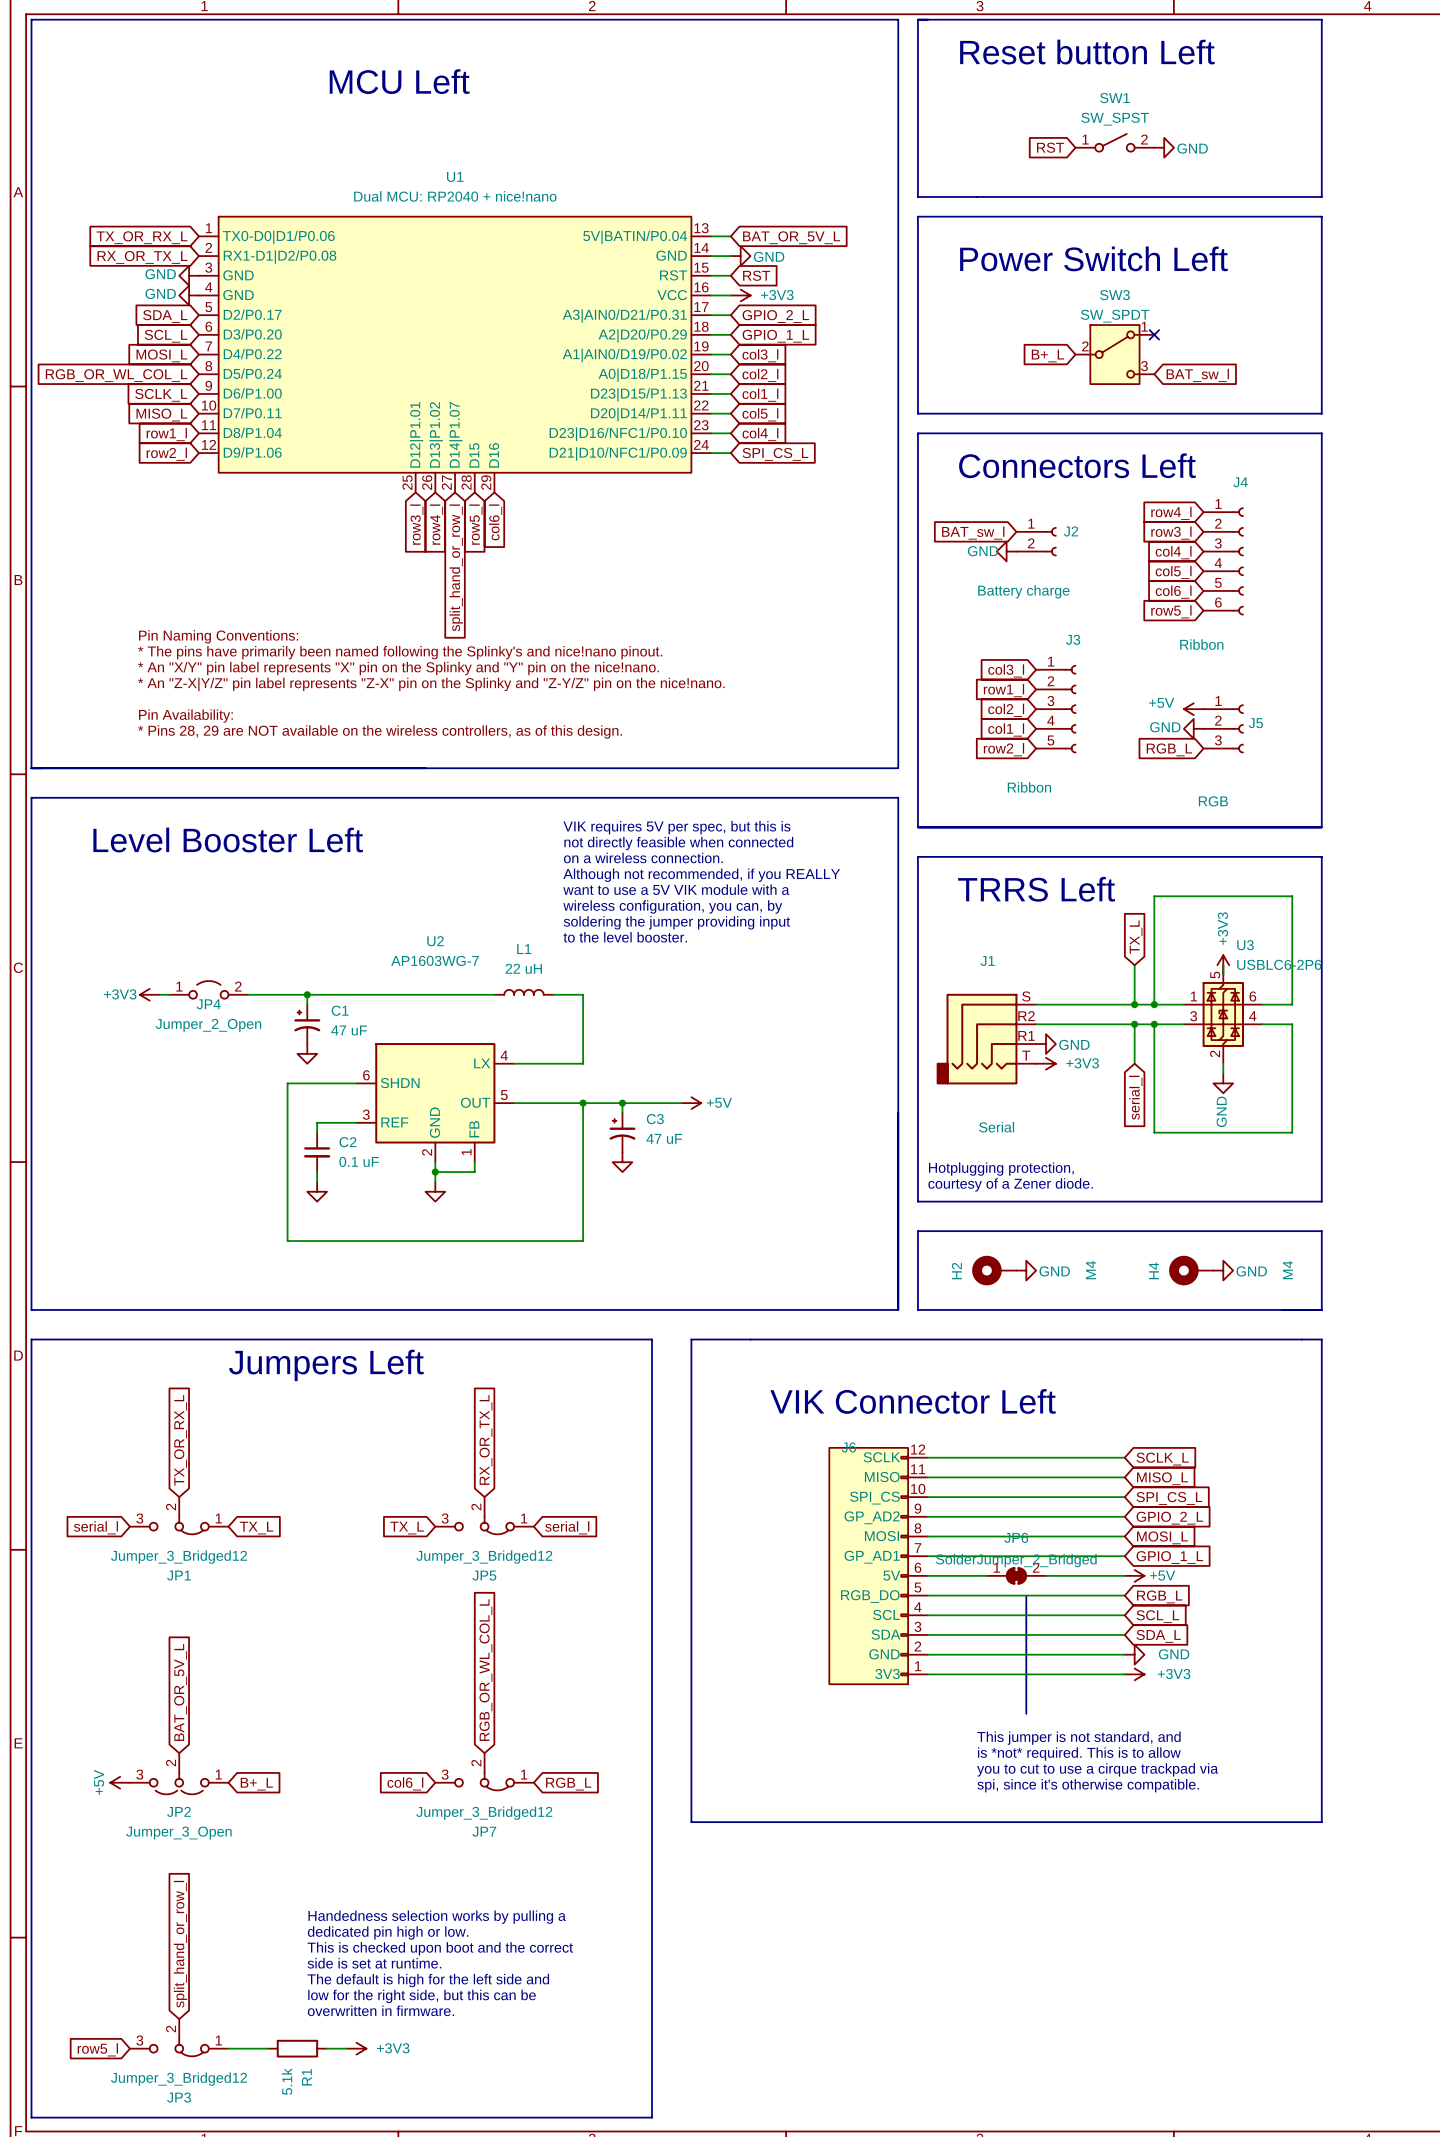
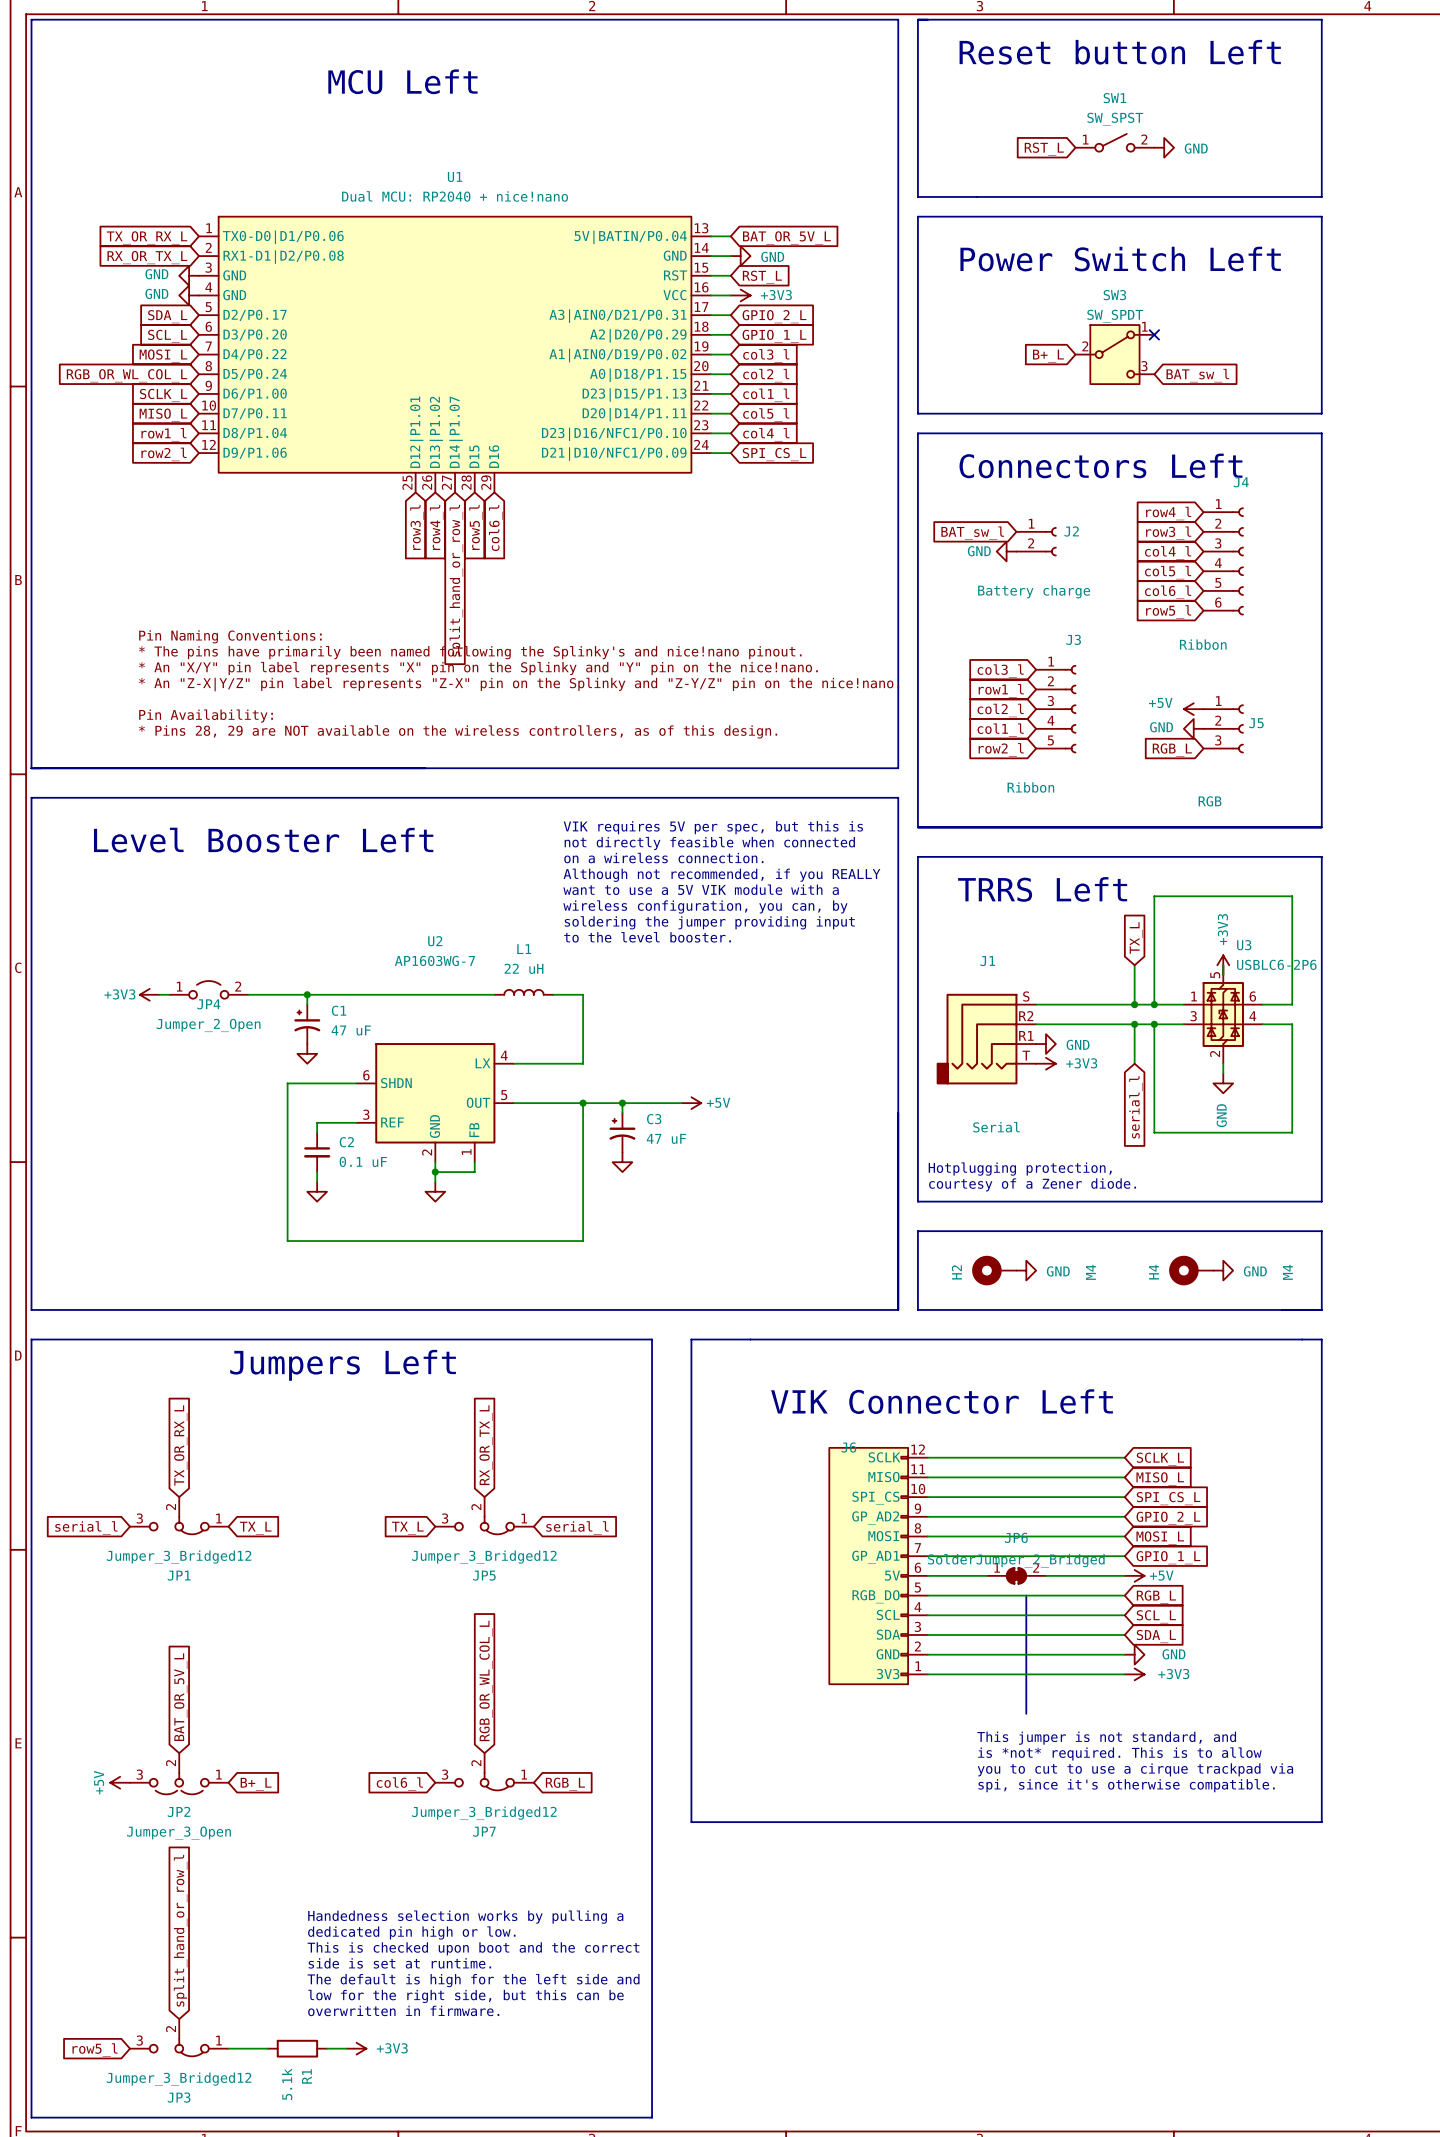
global label: RST (1050, 147) -> RST_L (1044, 149)
global label: RST (756, 275) -> RST_L (762, 277)

